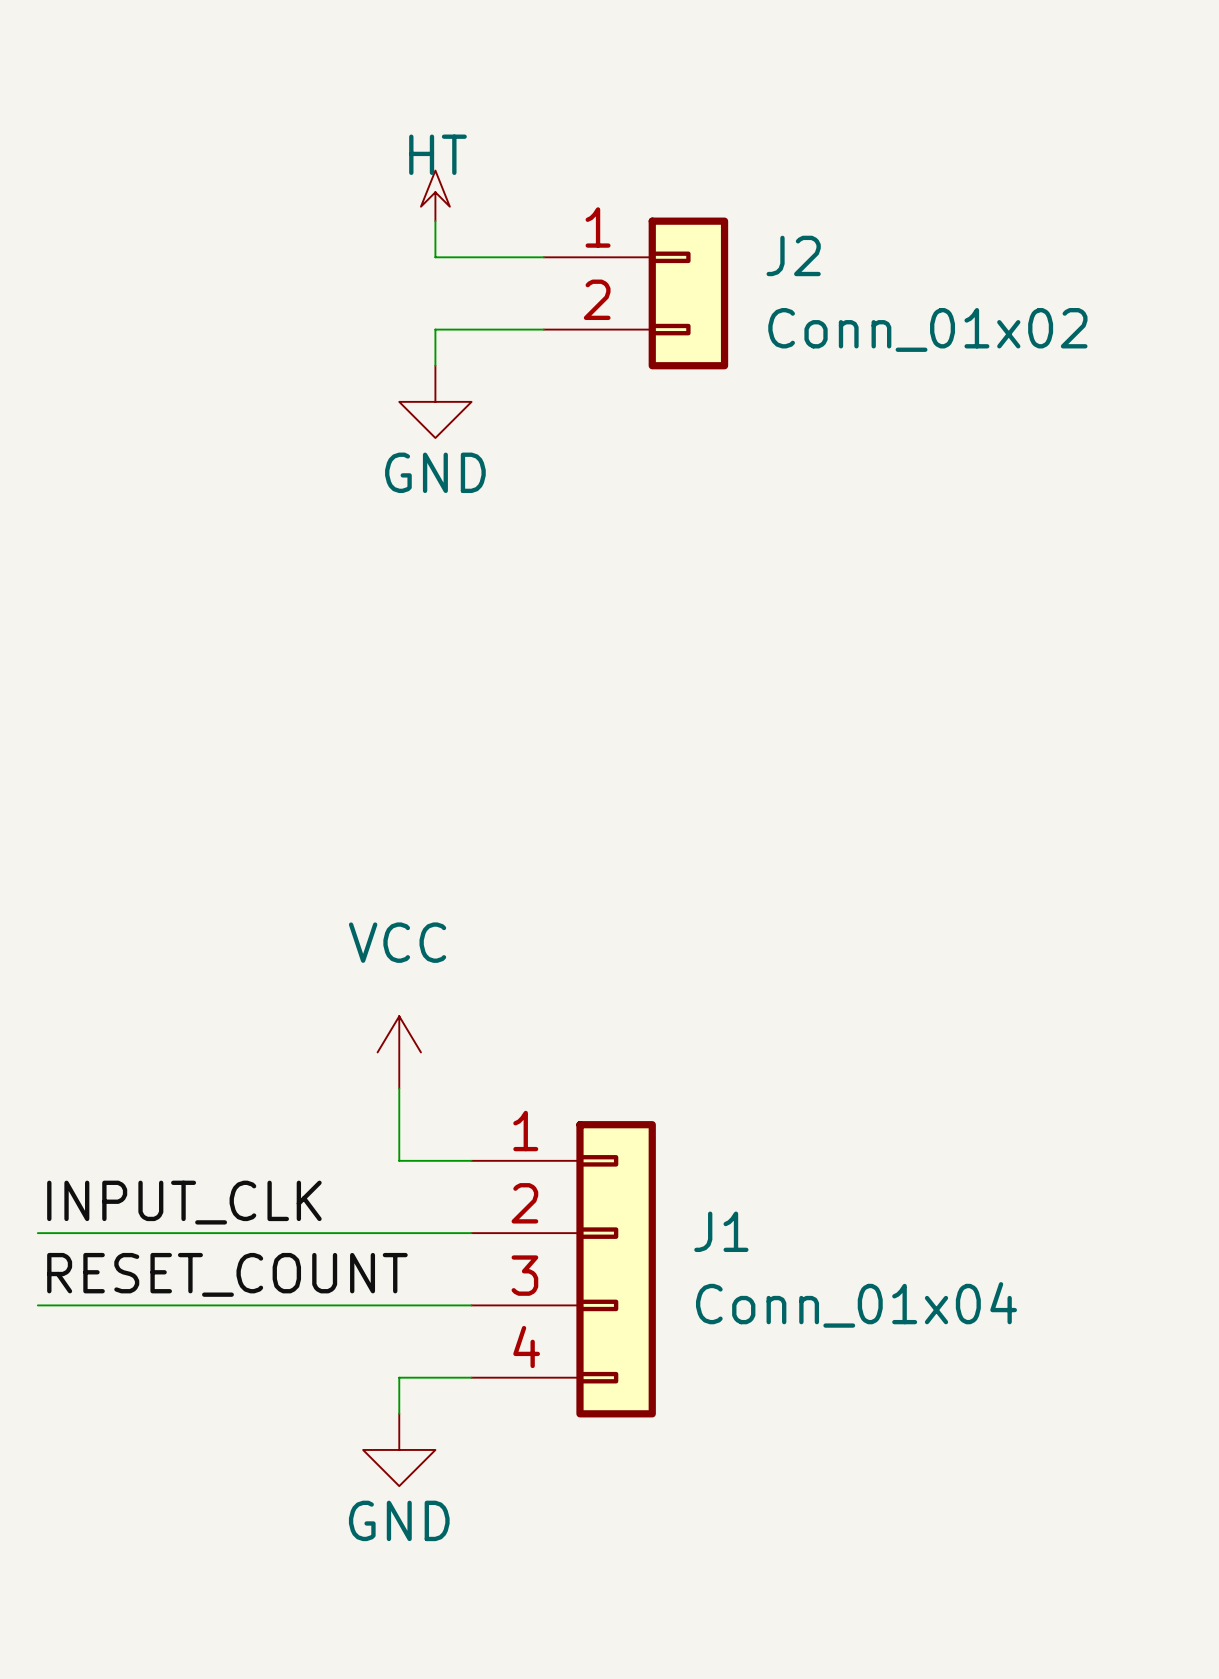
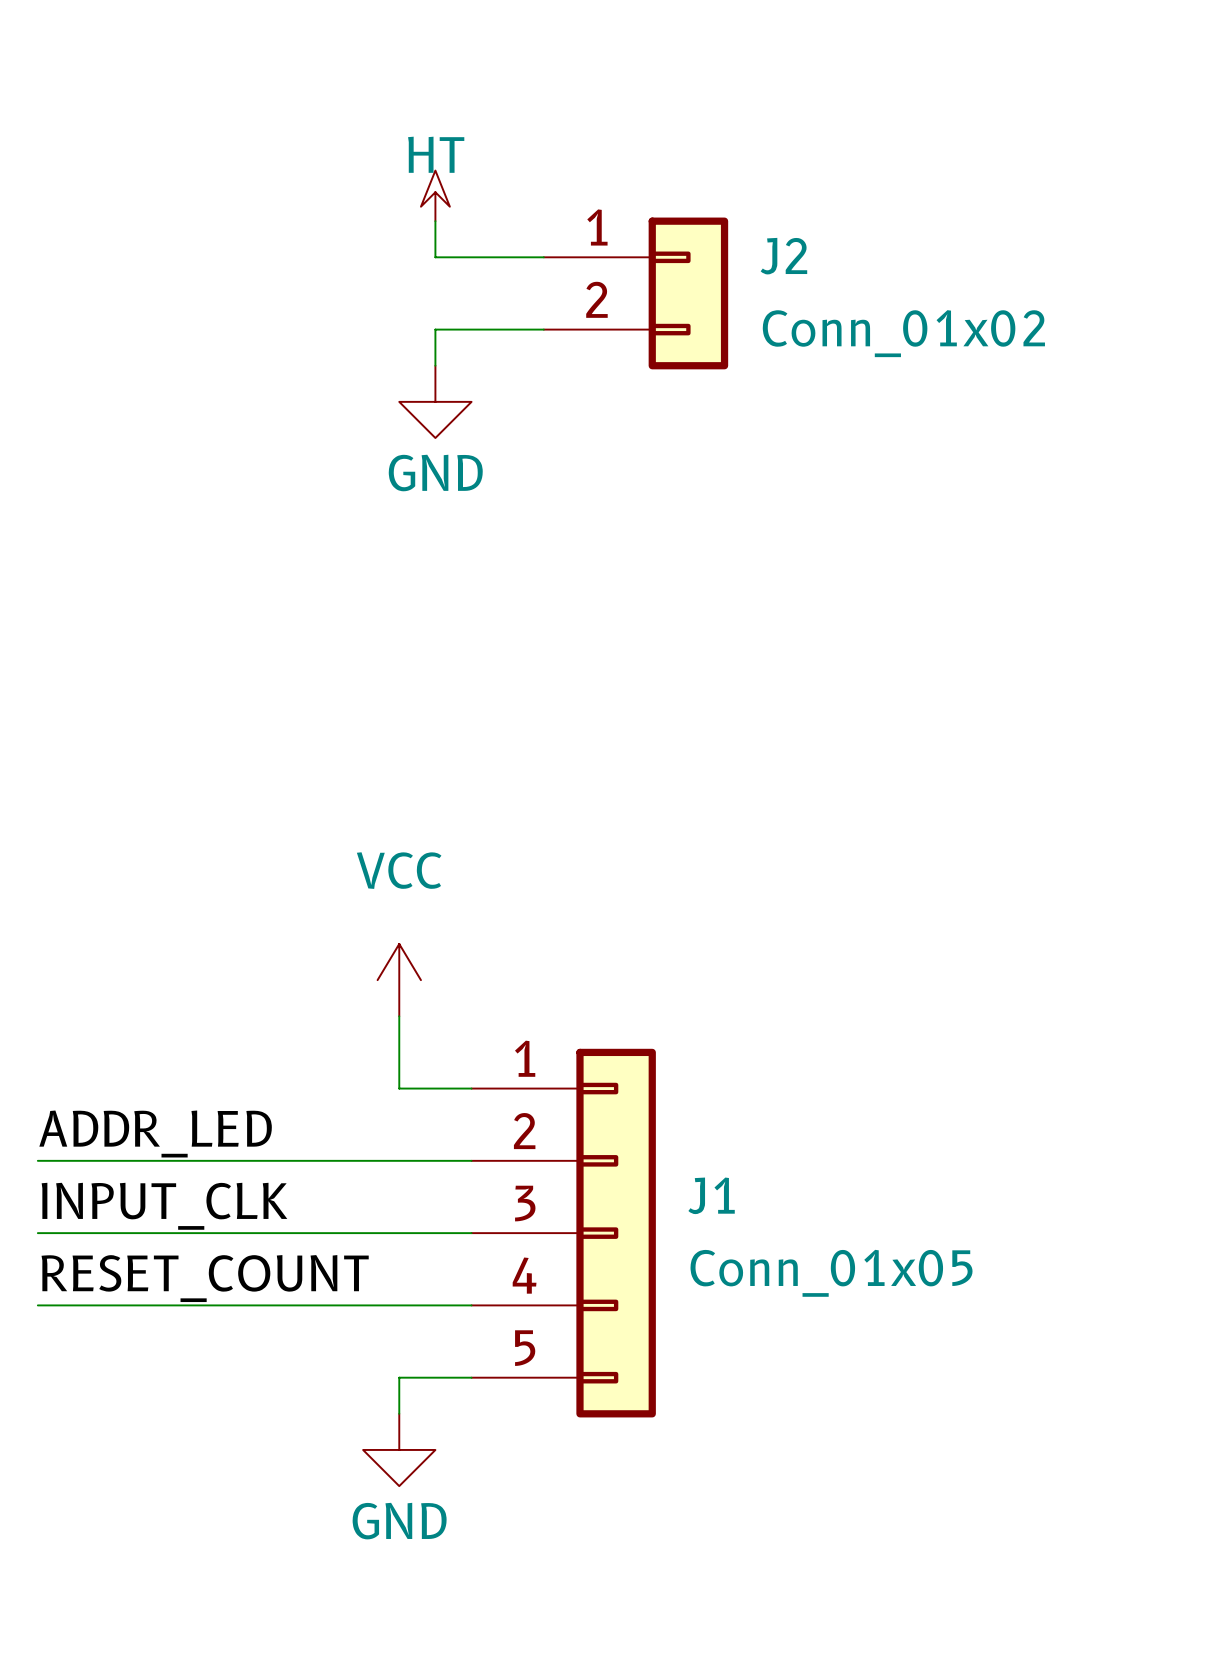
wire: none -> (399, 1016) (399, 1088) (471, 1088)
power symbol position: VCC (399, 1052) -> VCC (399, 980)
wire: (399, 1088) (399, 1160) -> (37, 1160) (399, 1160)
J1 symbol: [471, 1121, 656, 1418] -> [471, 1048, 656, 1418]
label: none -> ADDR_LED (155, 1134)
J1 value: Conn_01x04 (856, 1304) -> Conn_01x05 (831, 1273)

